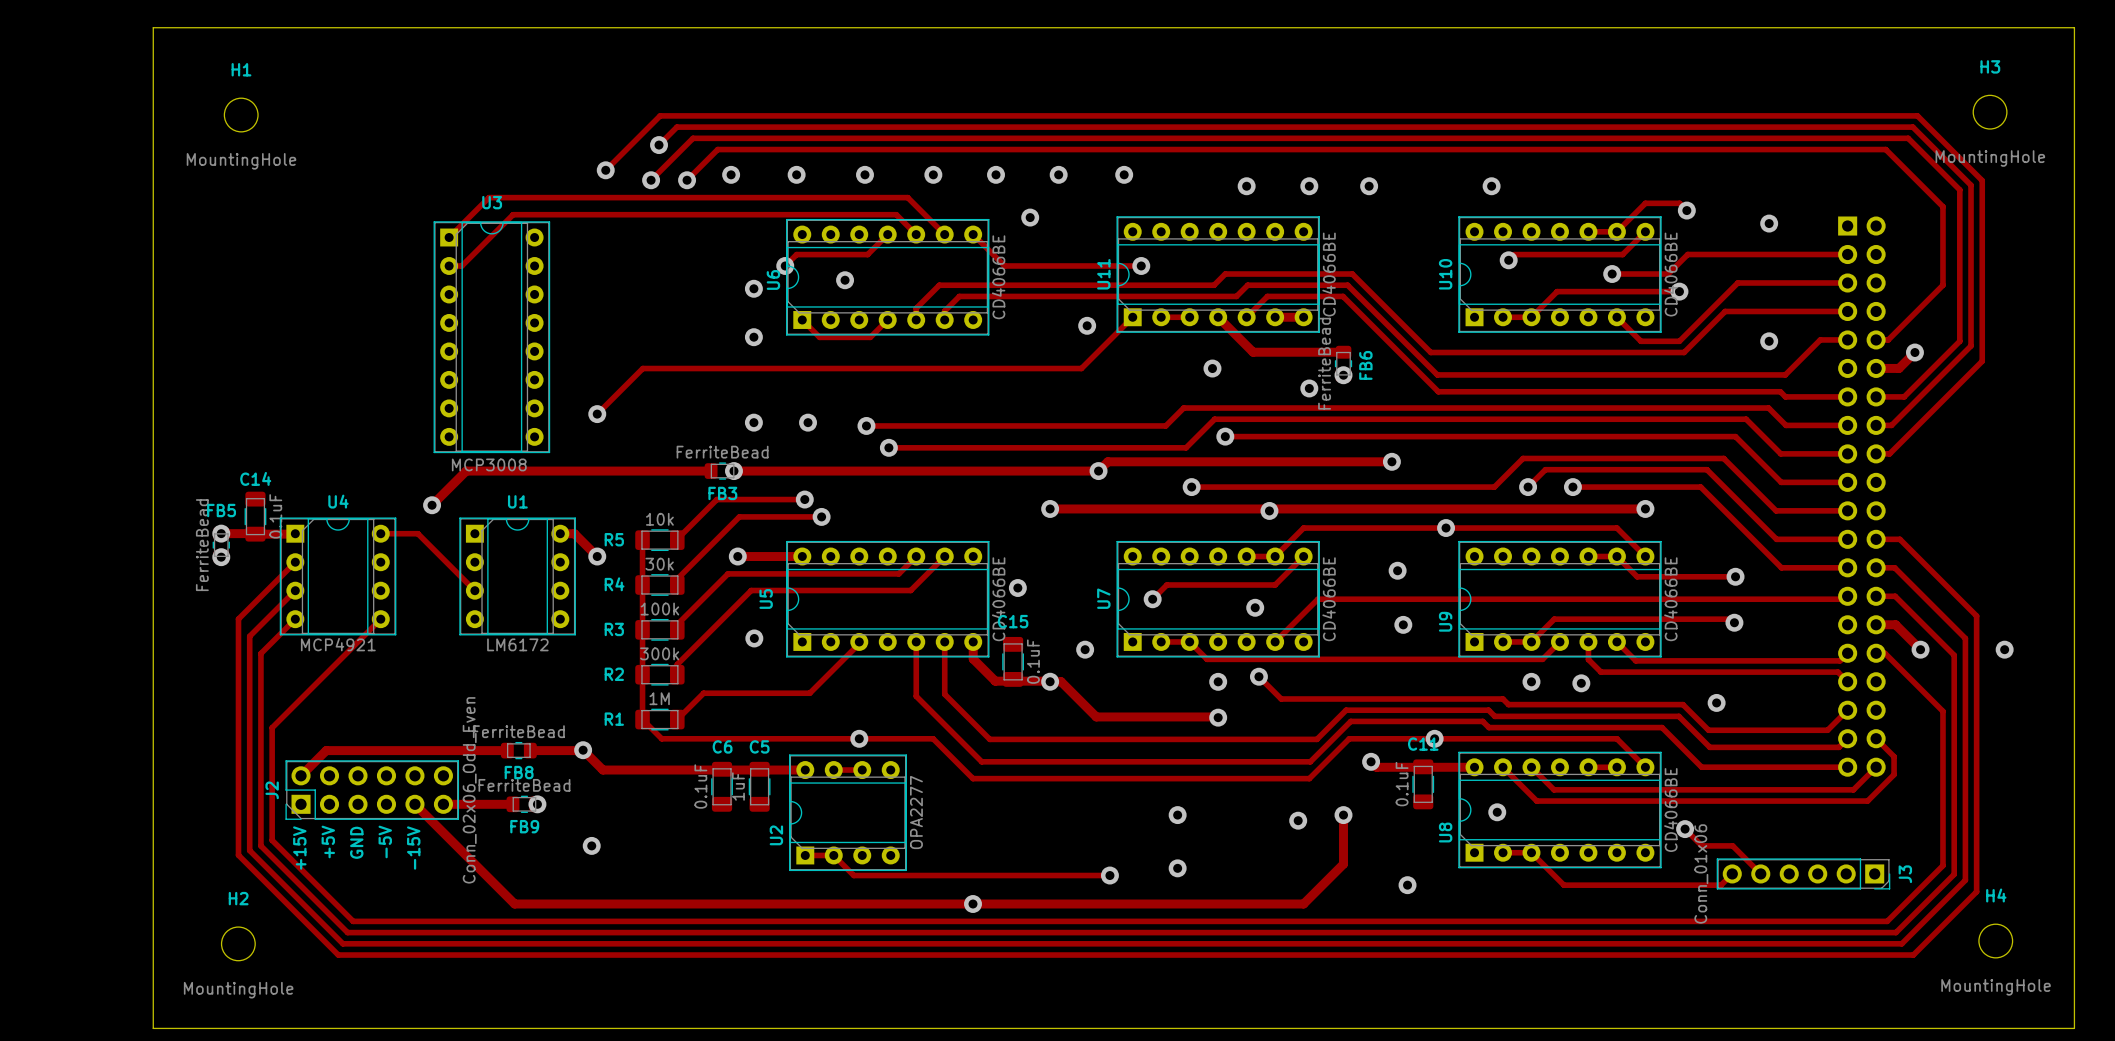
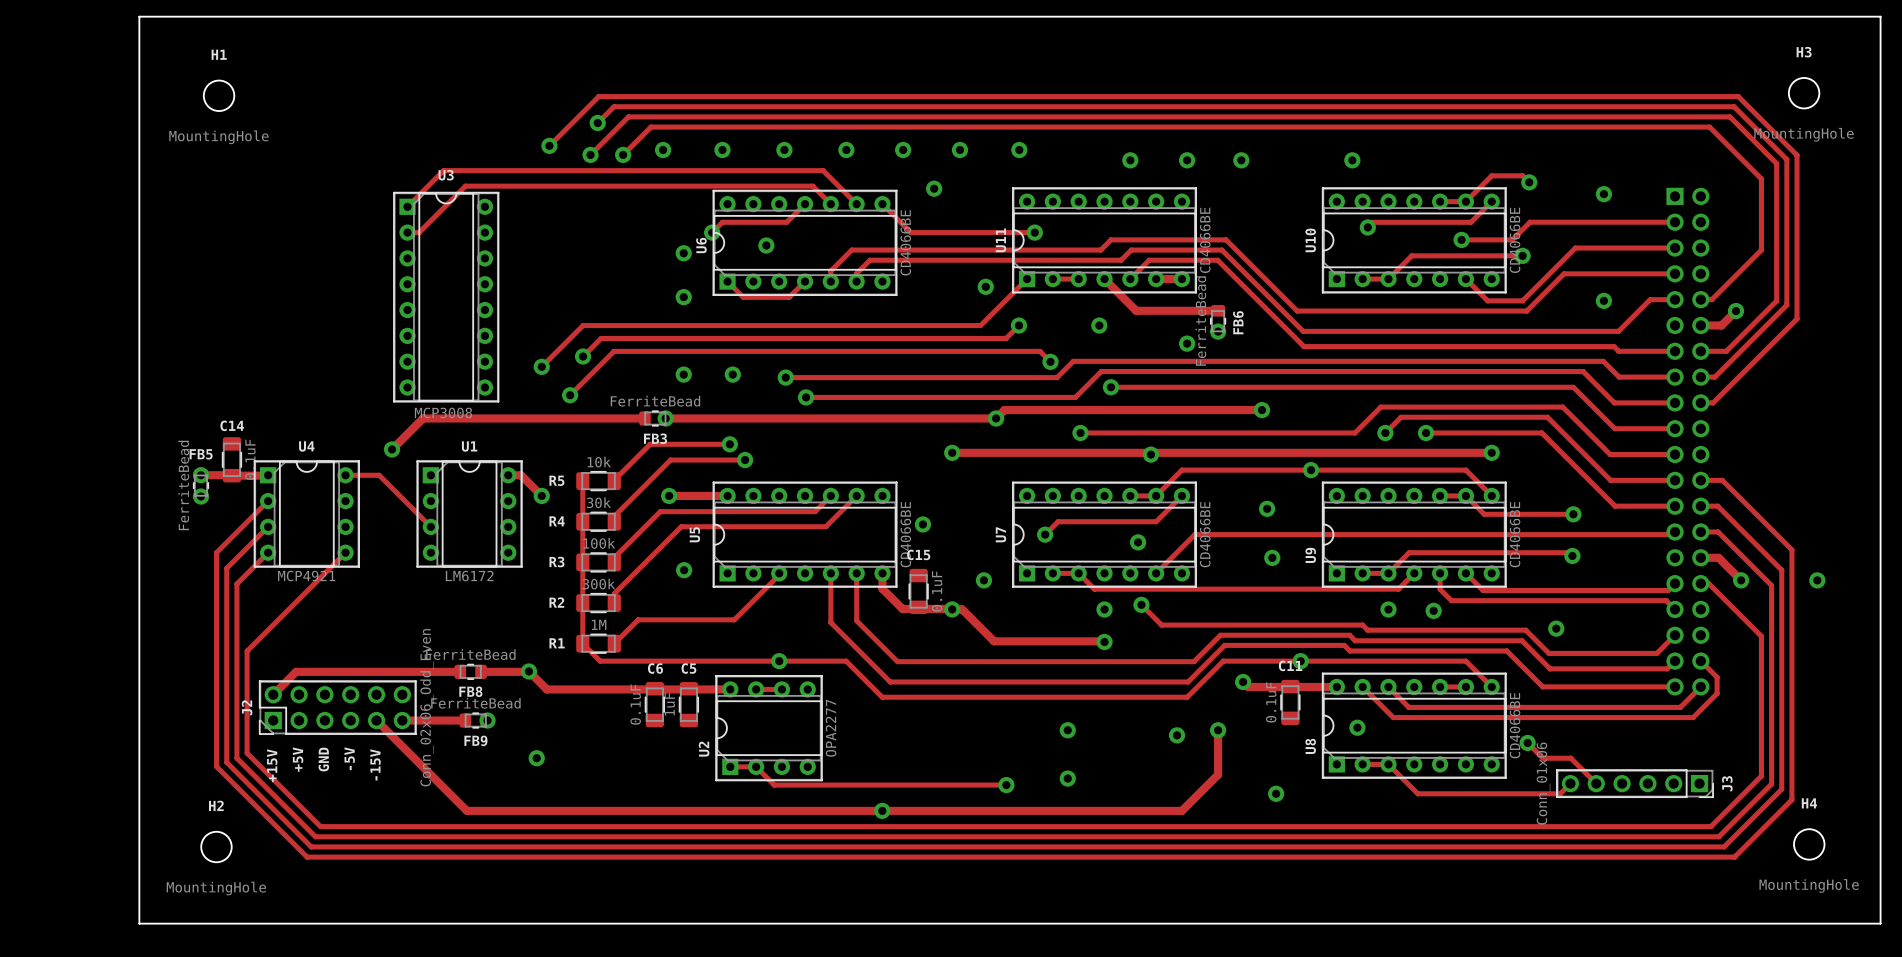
track: none -> (1019, 325) (1006, 338) (601, 338) (583, 356)
via: none -> (1019, 325)
via: none -> (583, 356)
track: none -> (1050, 361) (1040, 351) (614, 351) (570, 395)
via: none -> (1050, 361)
via: none -> (570, 395)

